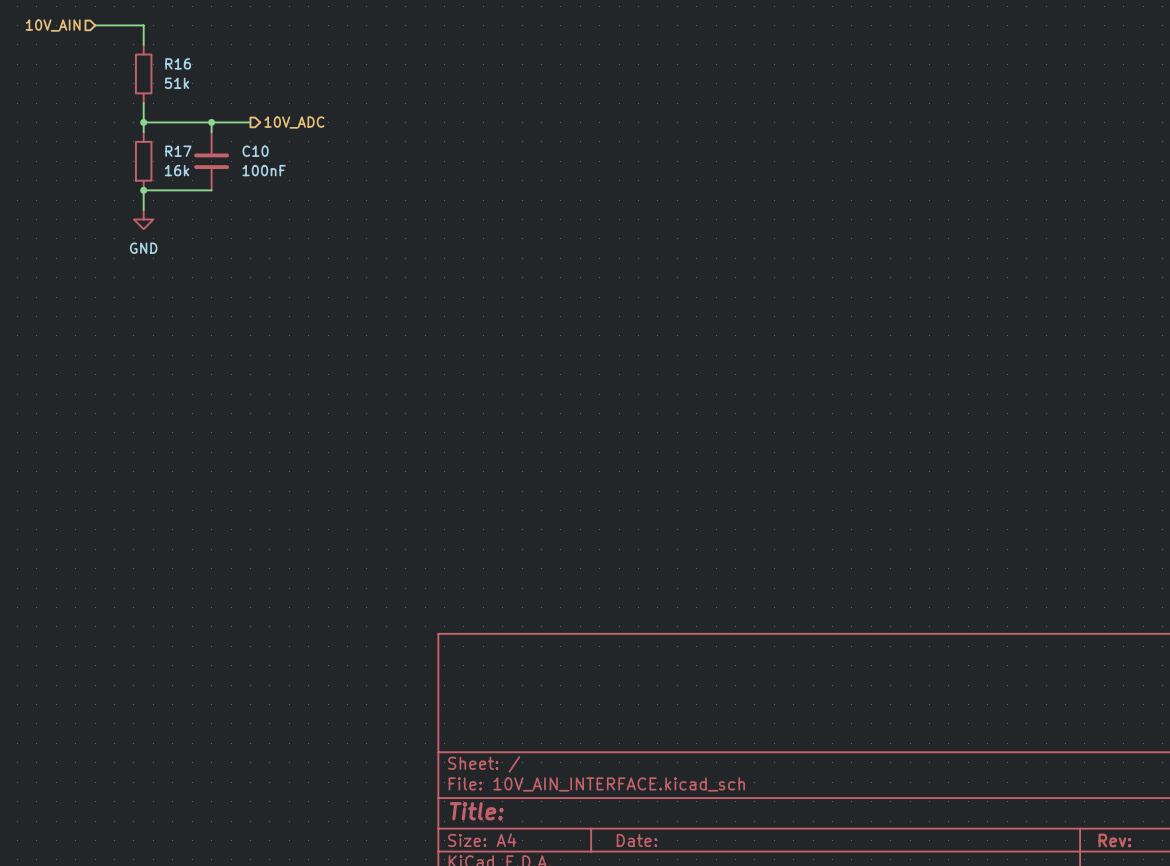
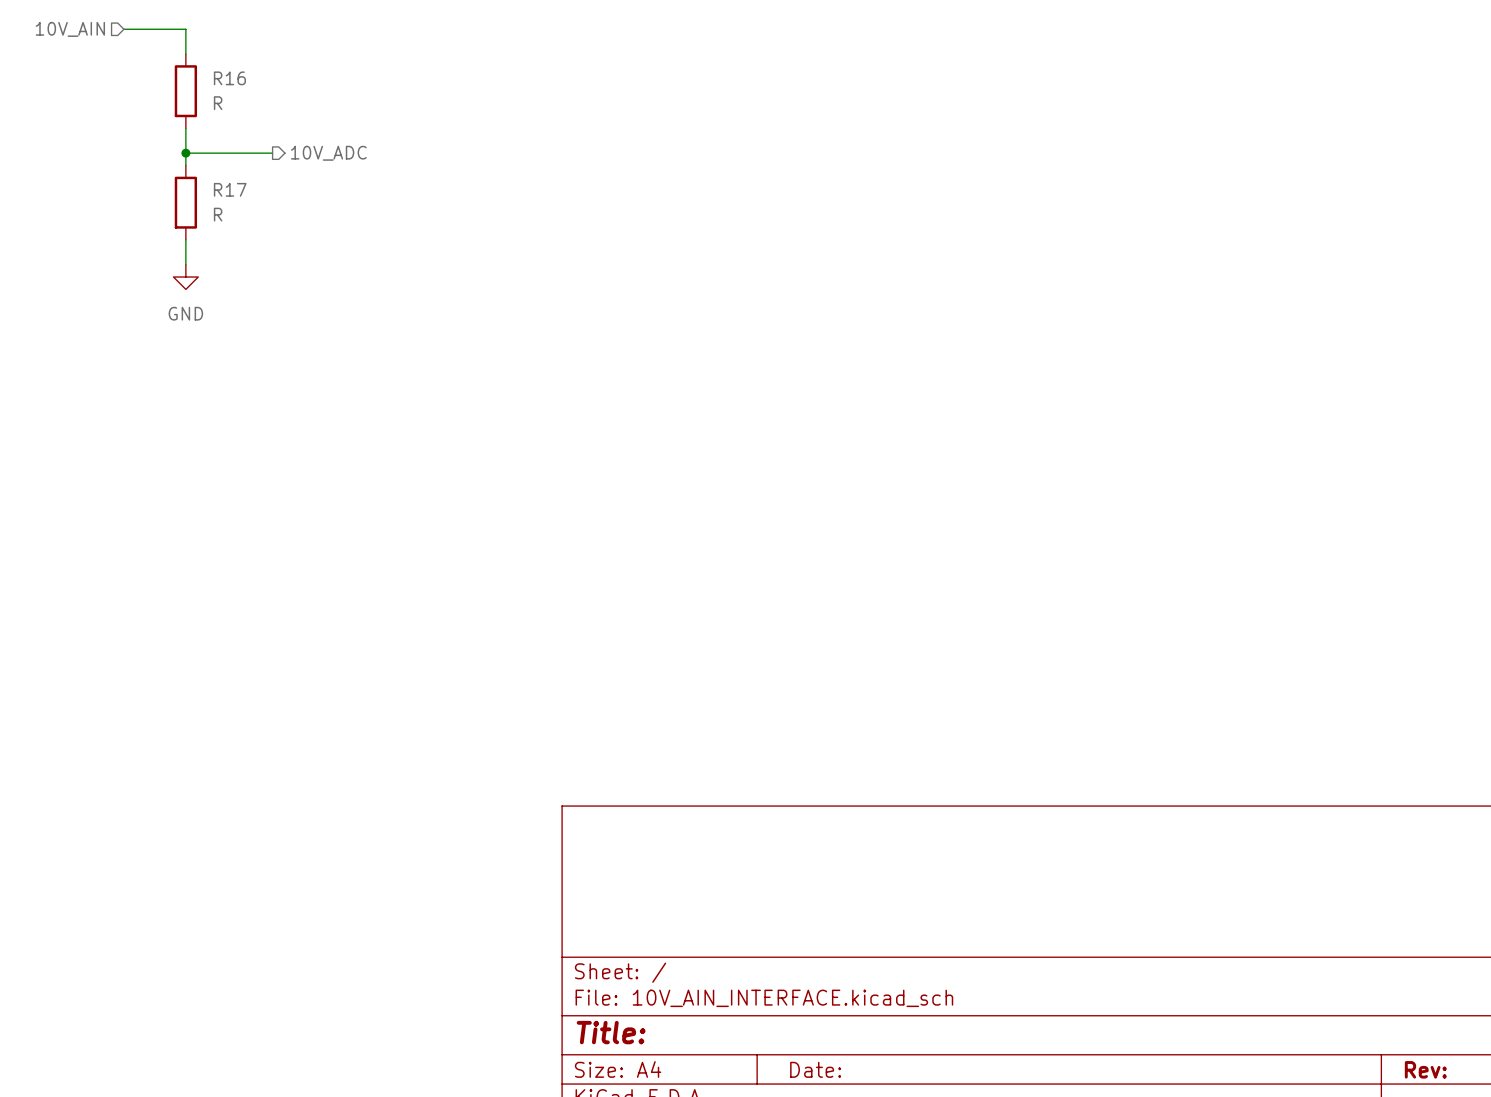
R16 value: 51k (177, 83) -> R (218, 103)
junction: (211, 122) -> none
wire: (250, 122) (211, 122) (211, 132) -> none
hierarchical label position: 10V_ADC (294, 122) -> 10V_ADC (328, 153)
C10: 100nF (211, 161) -> none
R17 value: 16k (177, 170) -> R (218, 214)
wire: (143, 190) (211, 190) -> none
junction: (143, 190) -> none

